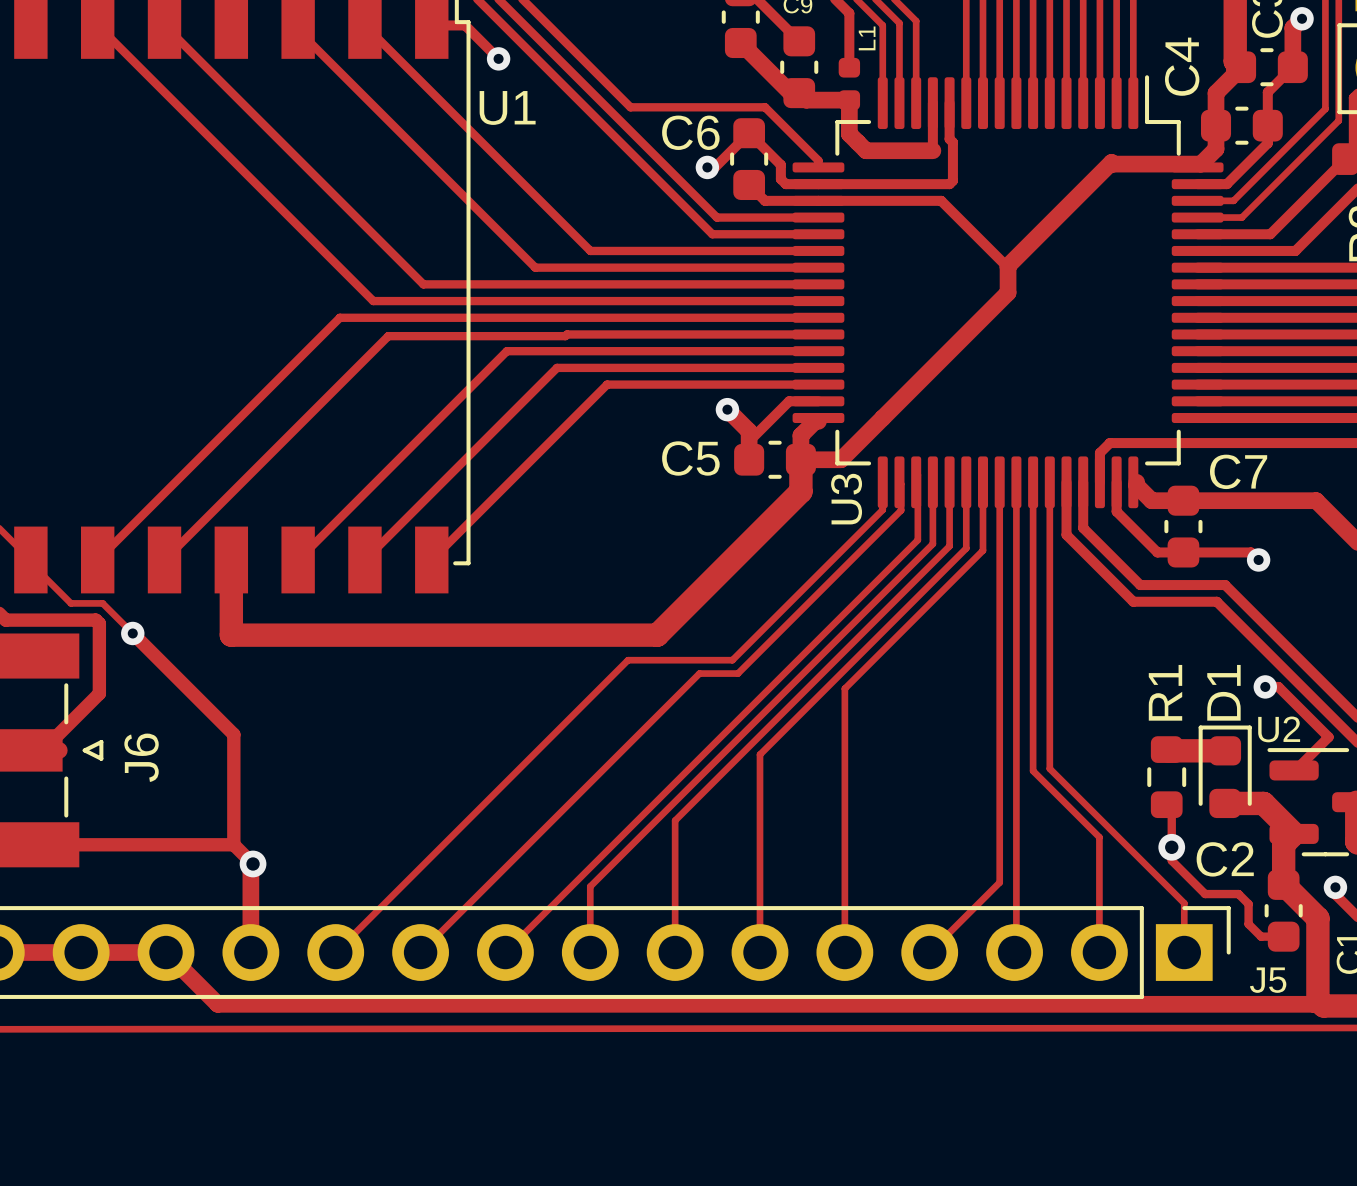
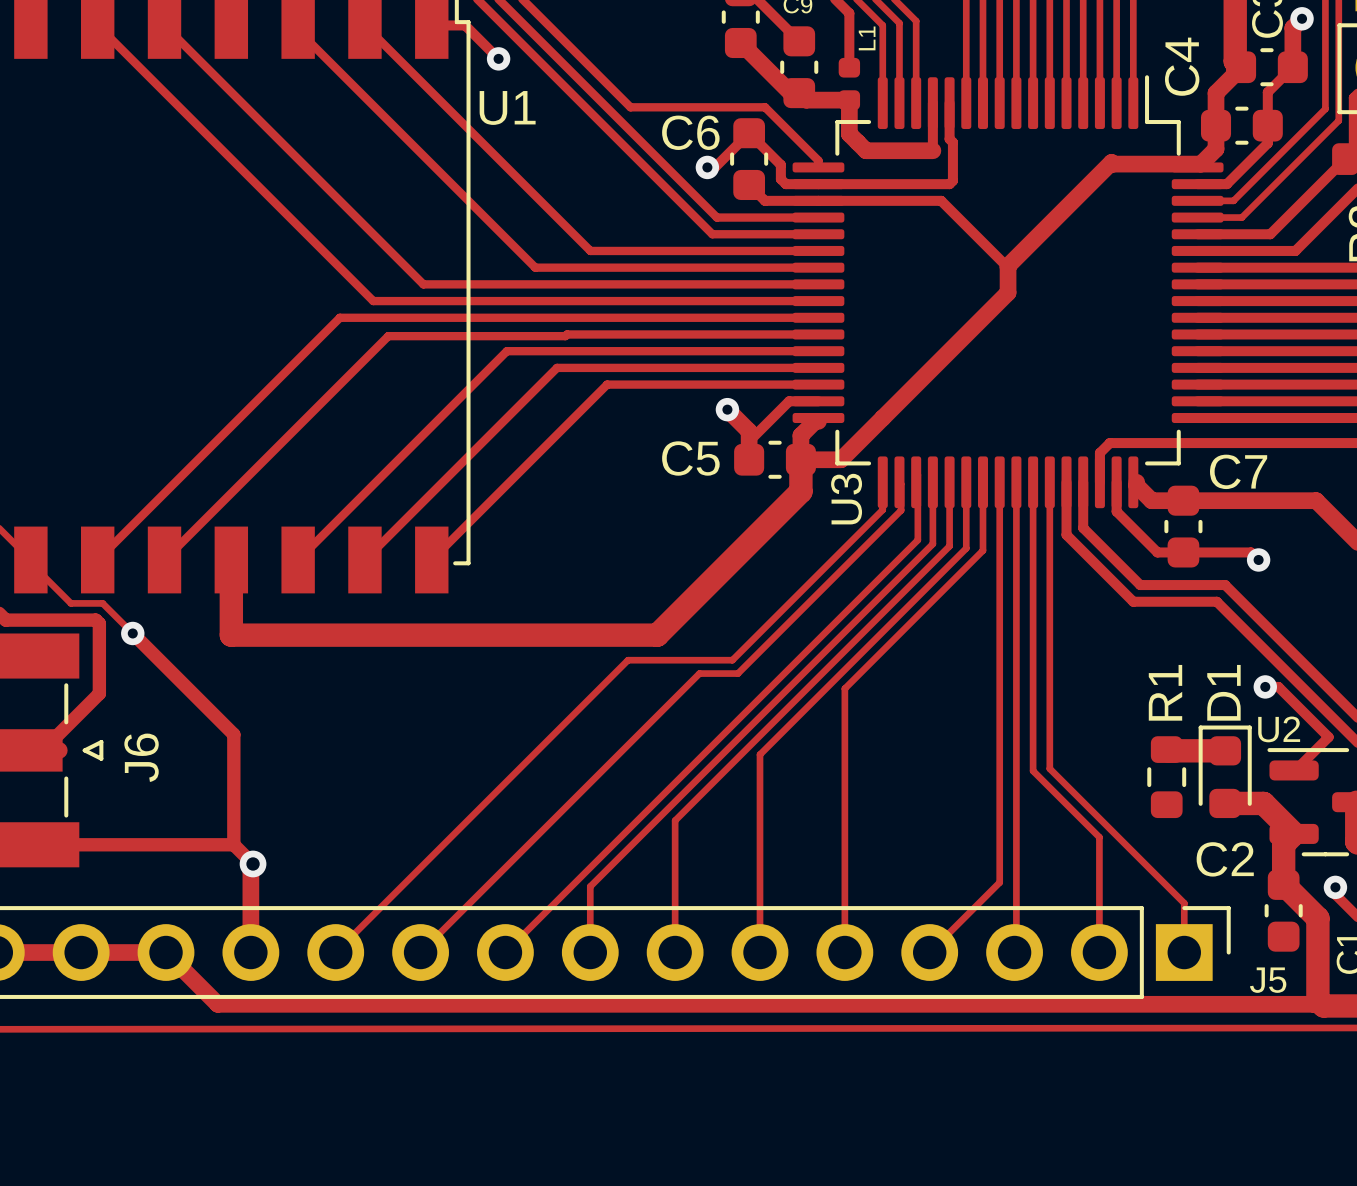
track: (1166, 804) (1171, 809) (1171, 860) (1205, 894) (1238, 894) (1248, 904) (1248, 924) (1261, 936) (1283, 936) -> none
via: (1171, 847) -> none

